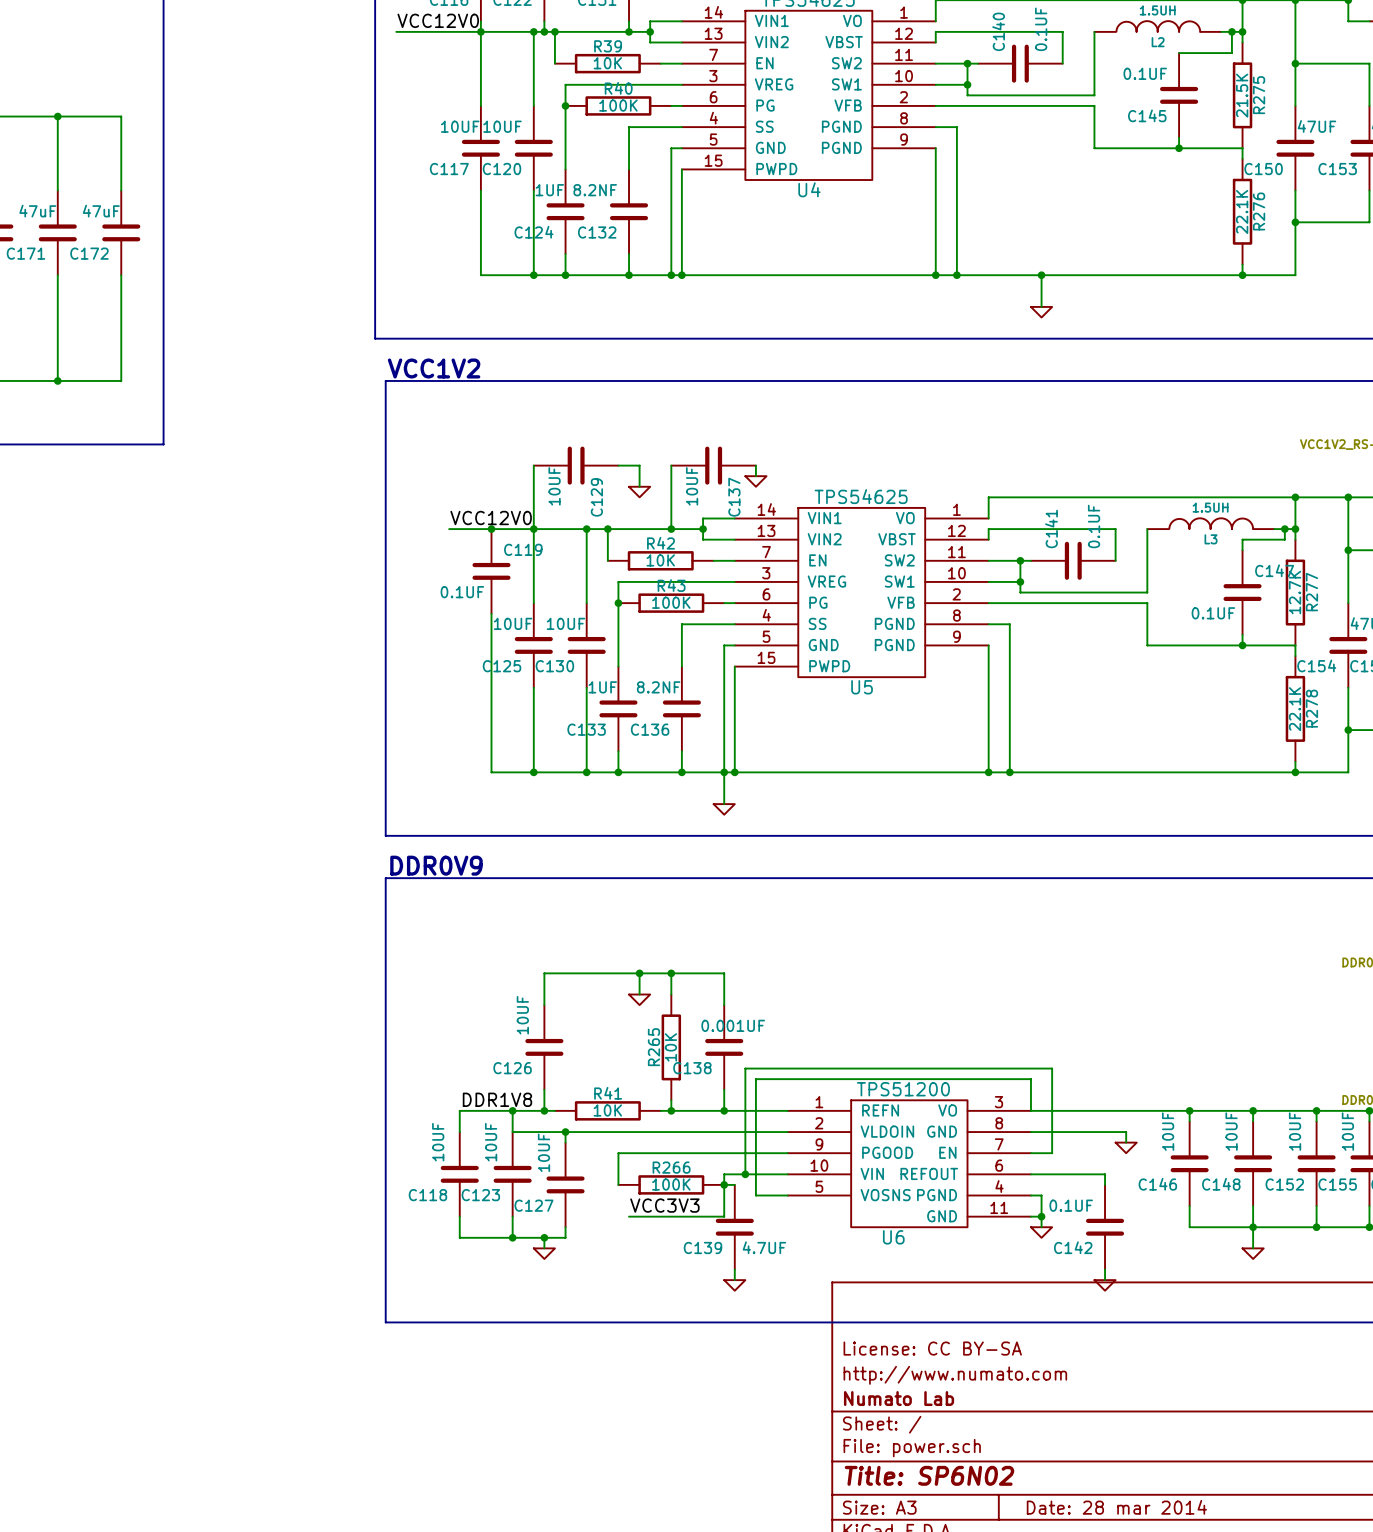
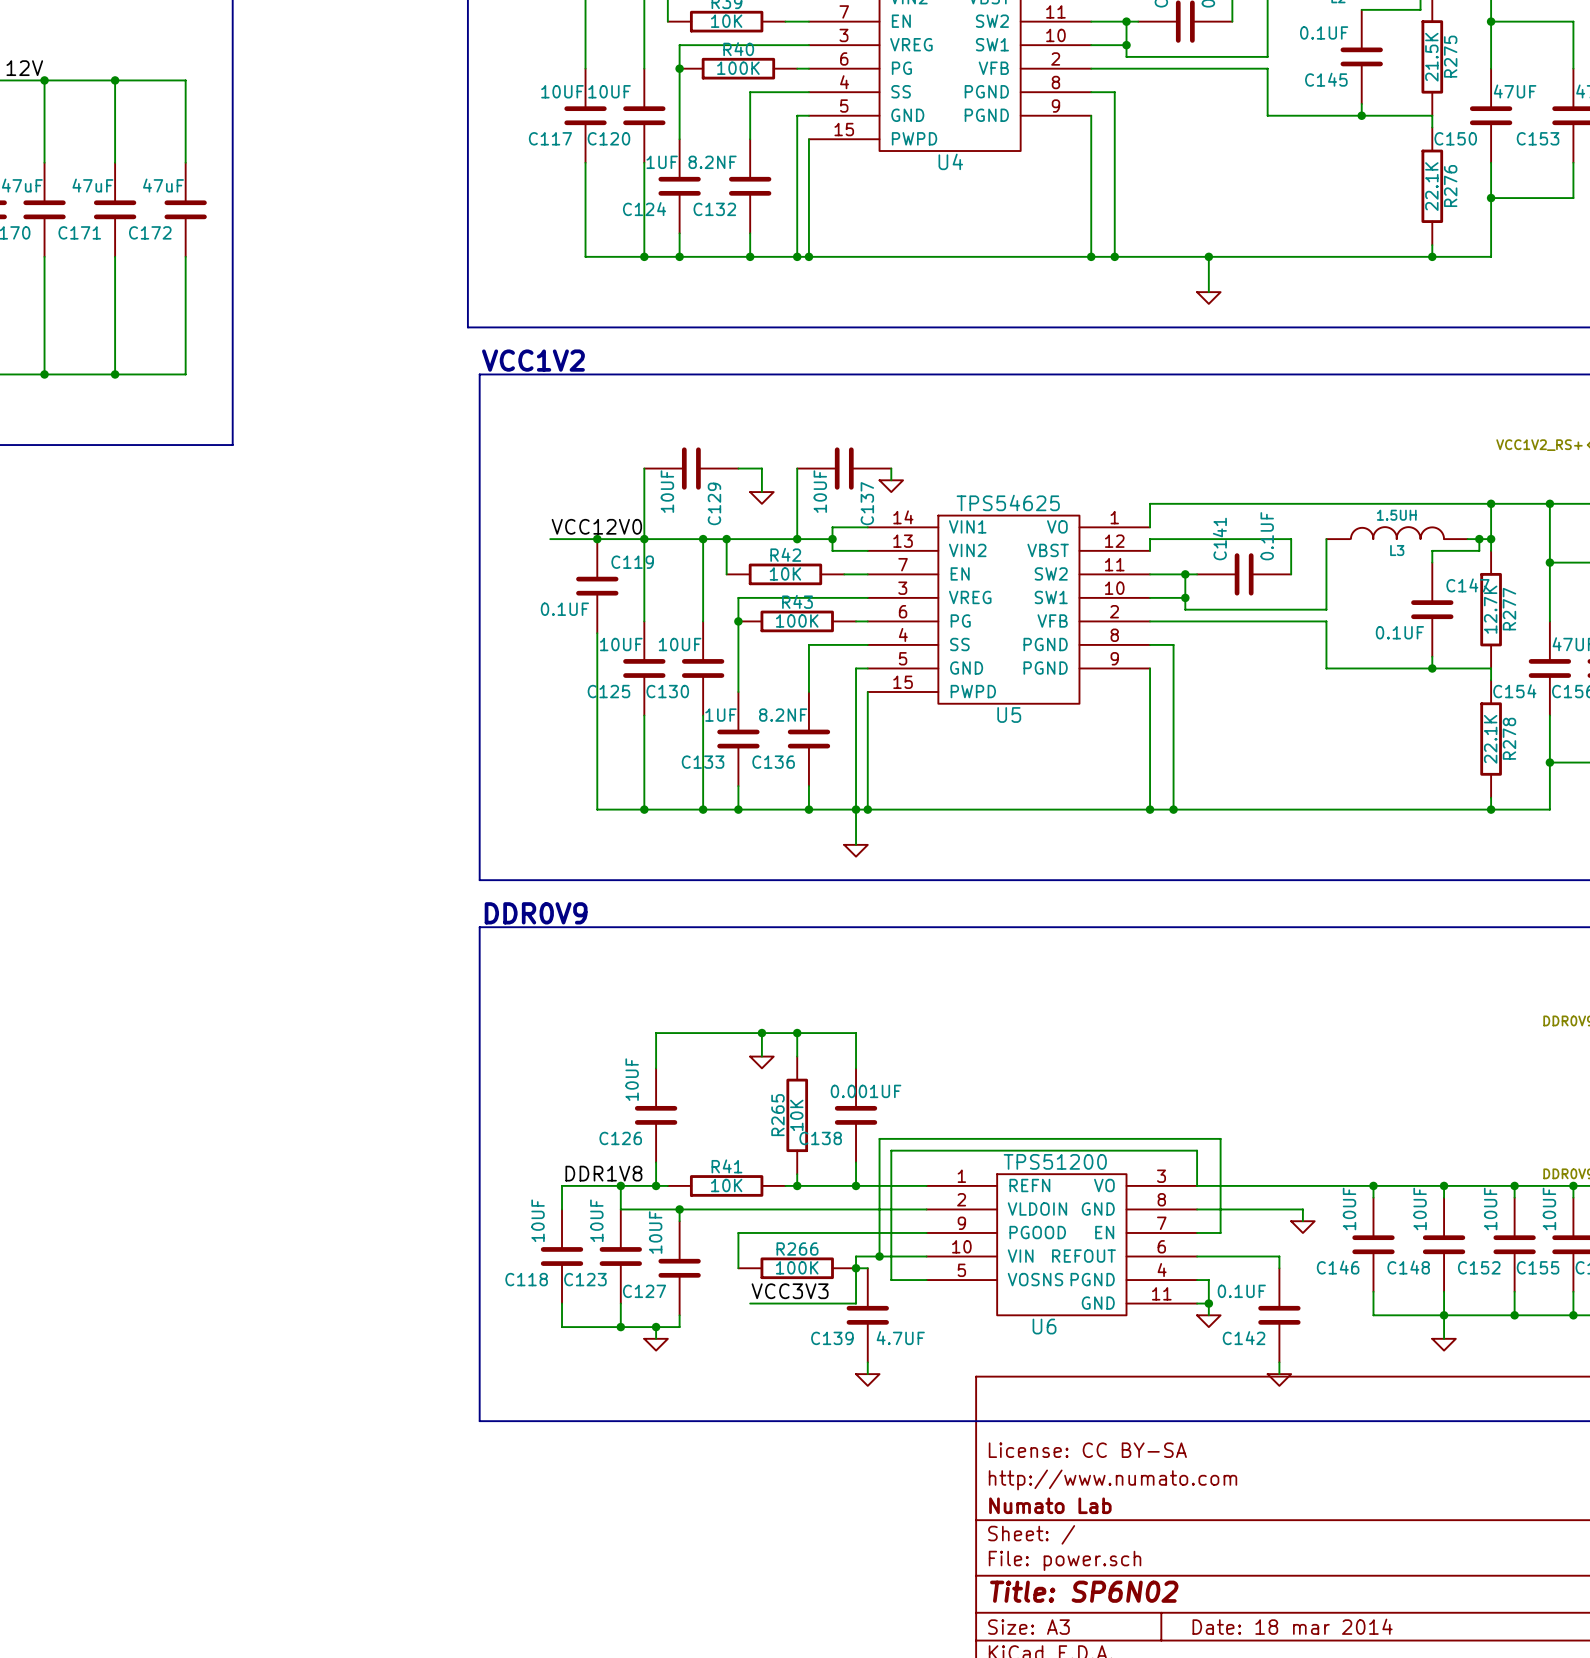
title block: Date: 28 mar 2014 (1116, 1507) -> Date: 18 mar 2014 (1292, 1626)

